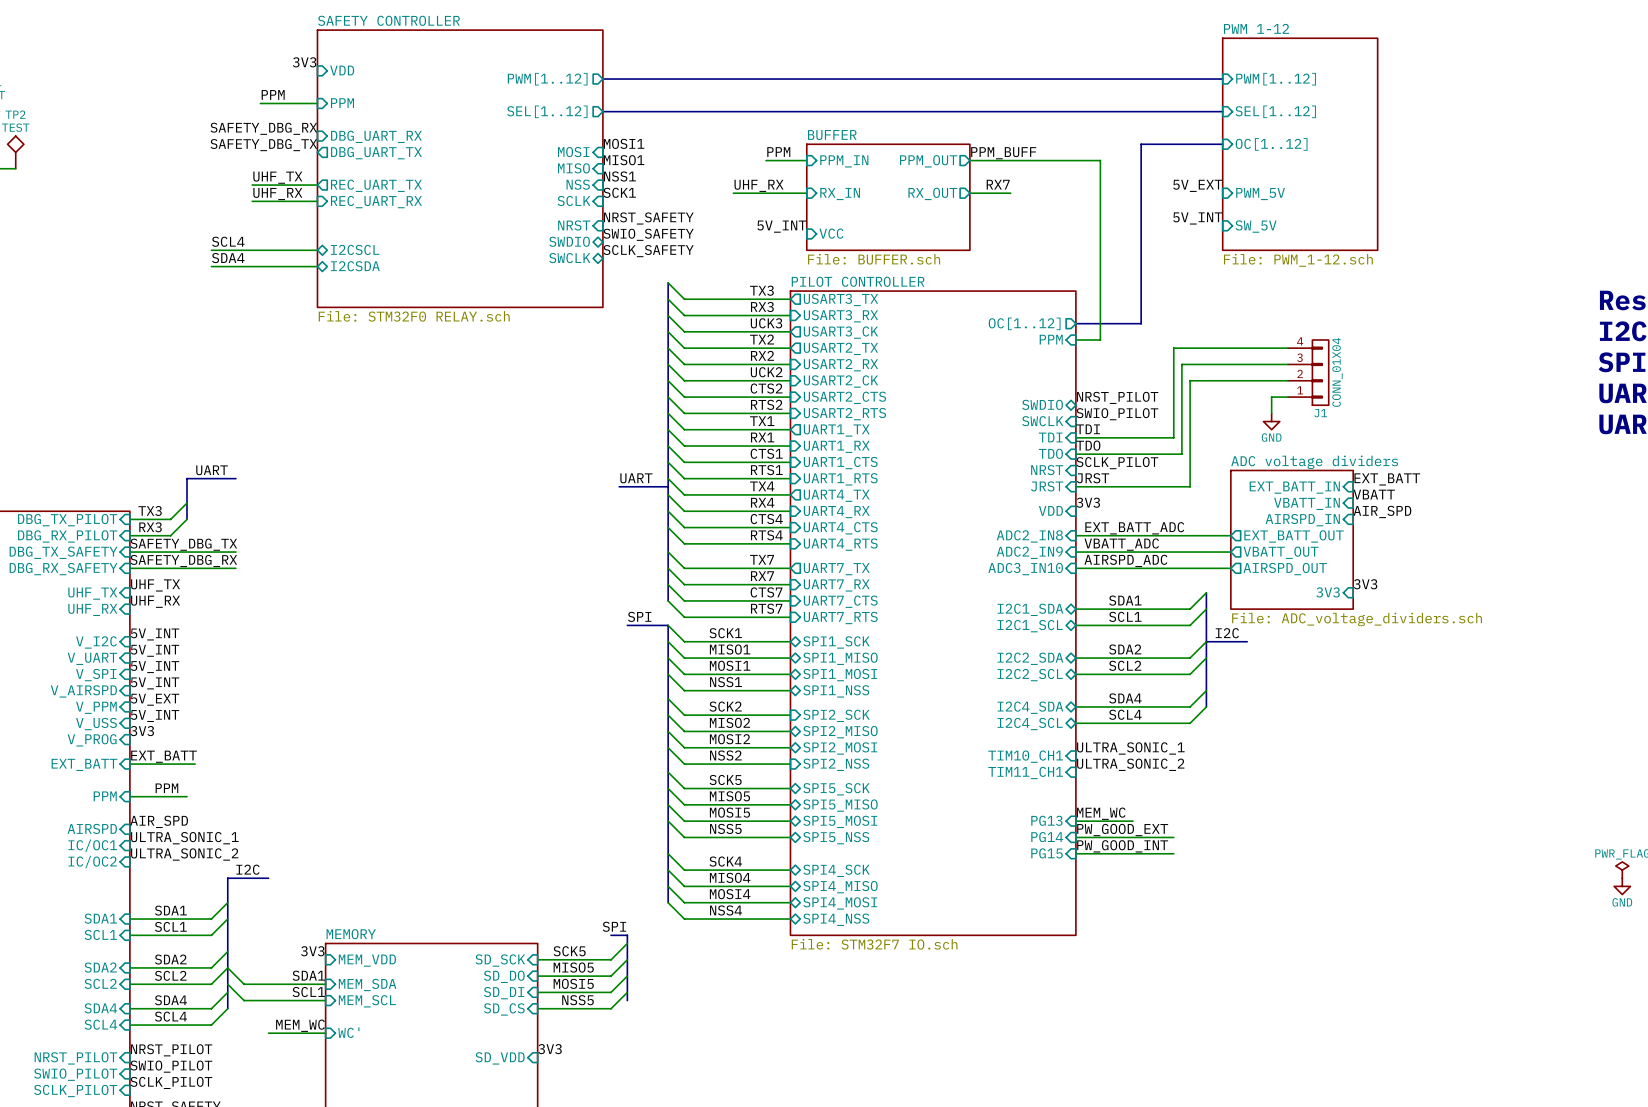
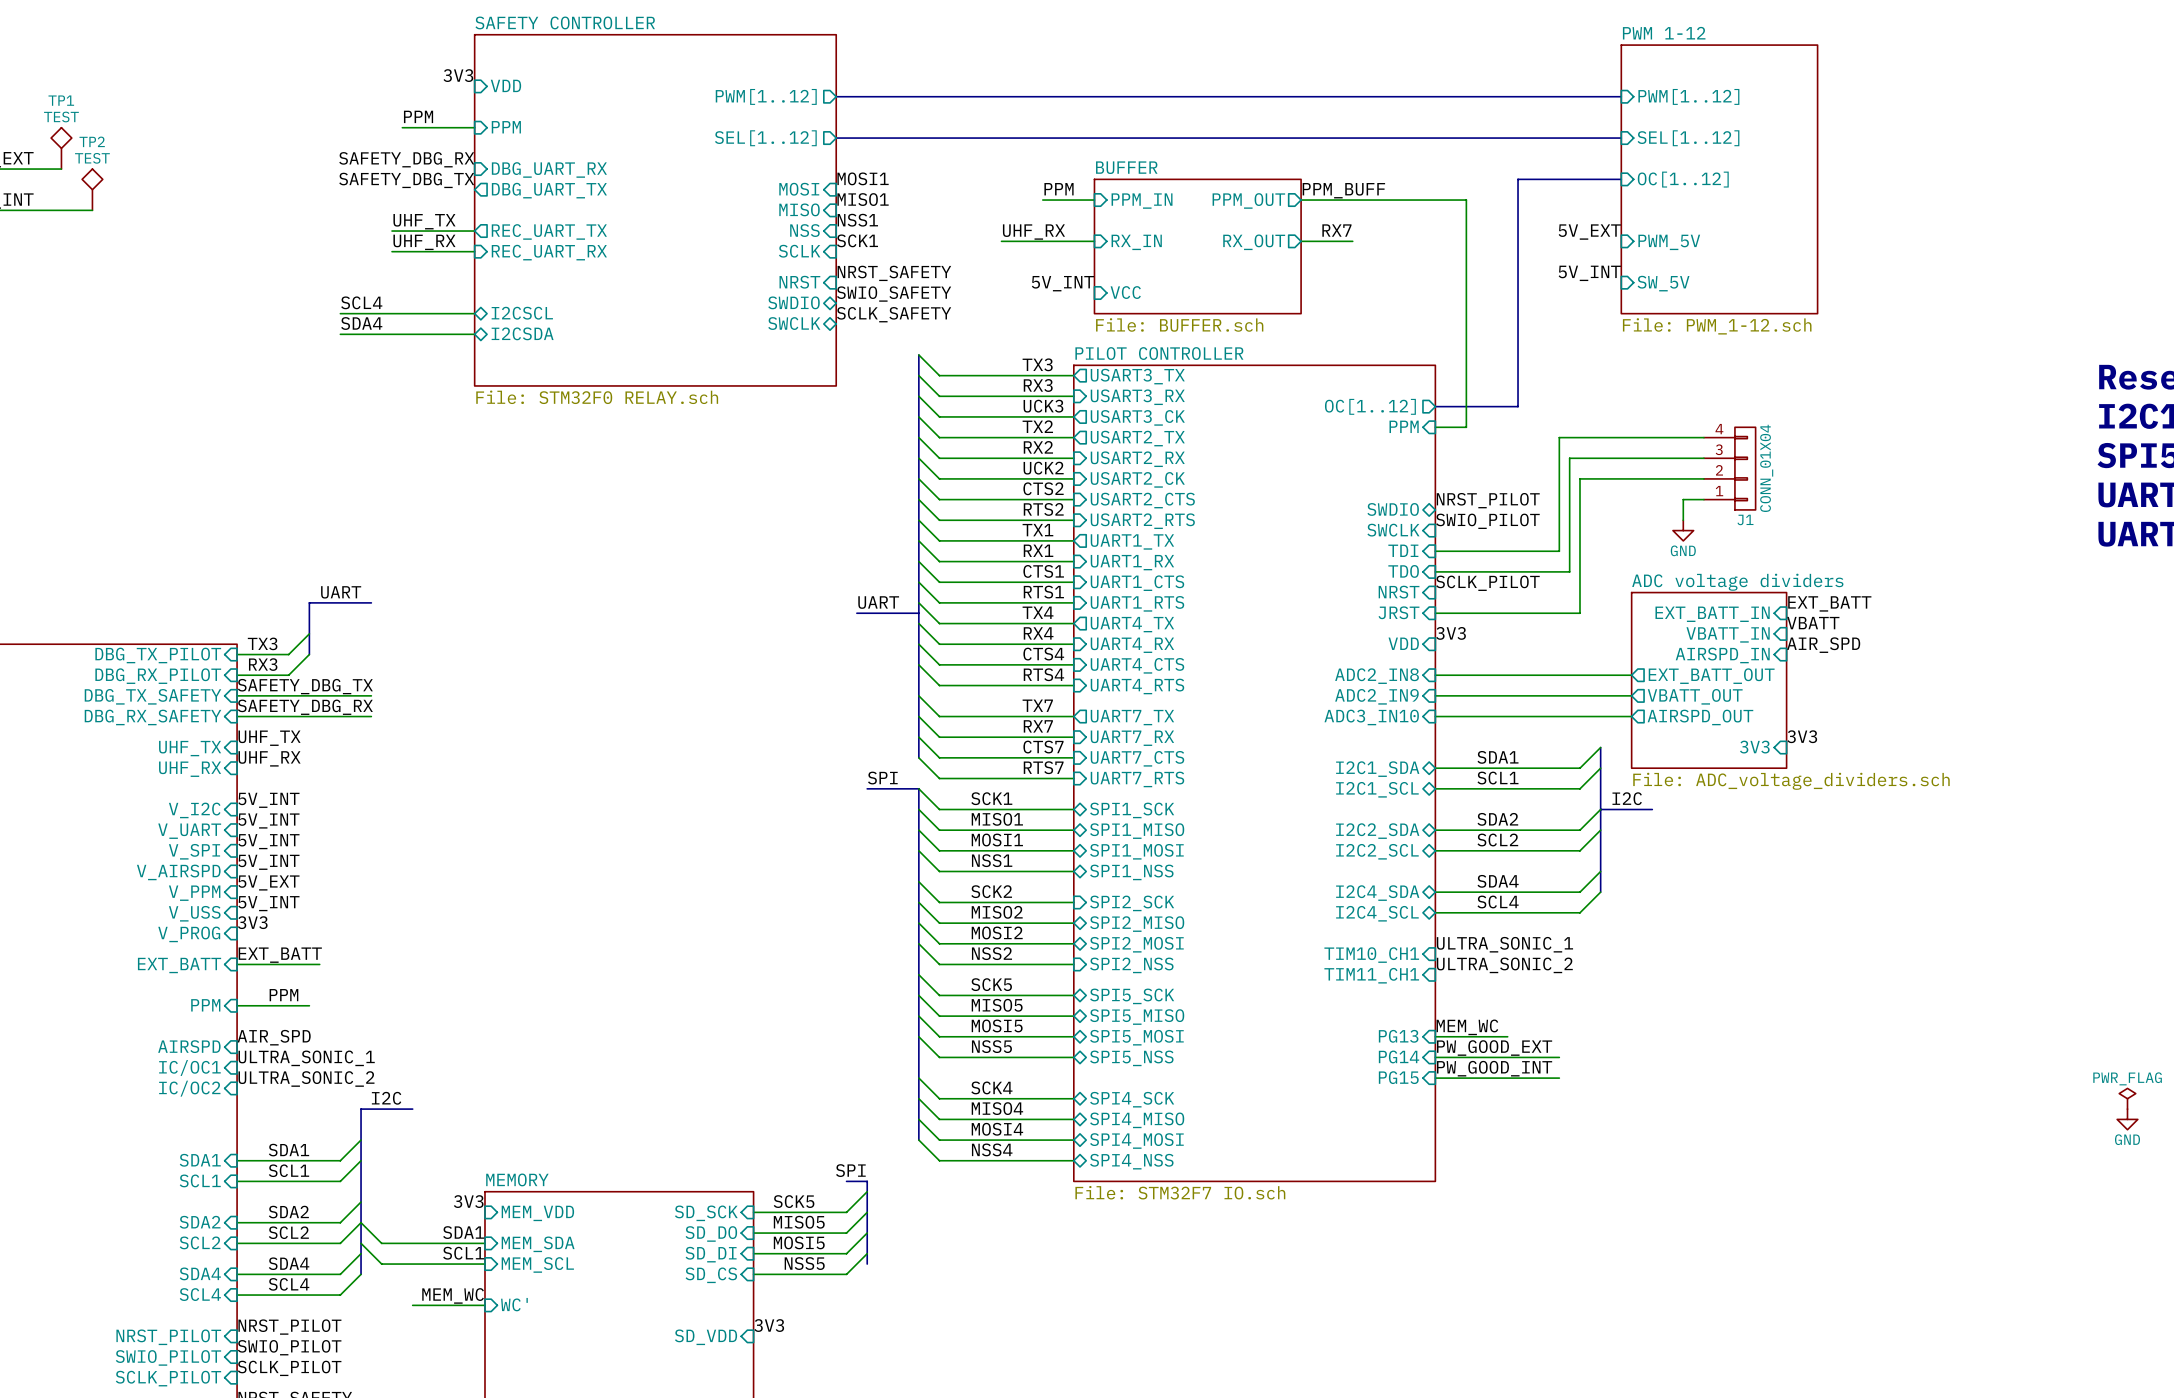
label: TDI (1088, 429) -> none
label: TDO (1088, 445) -> none
label: JRST (1093, 478) -> none
label: EXT_BATT_ADC (1134, 528) -> none
label: VBATT_ADC (1121, 544) -> none
label: AIRSPD_ADC (1125, 560) -> none

